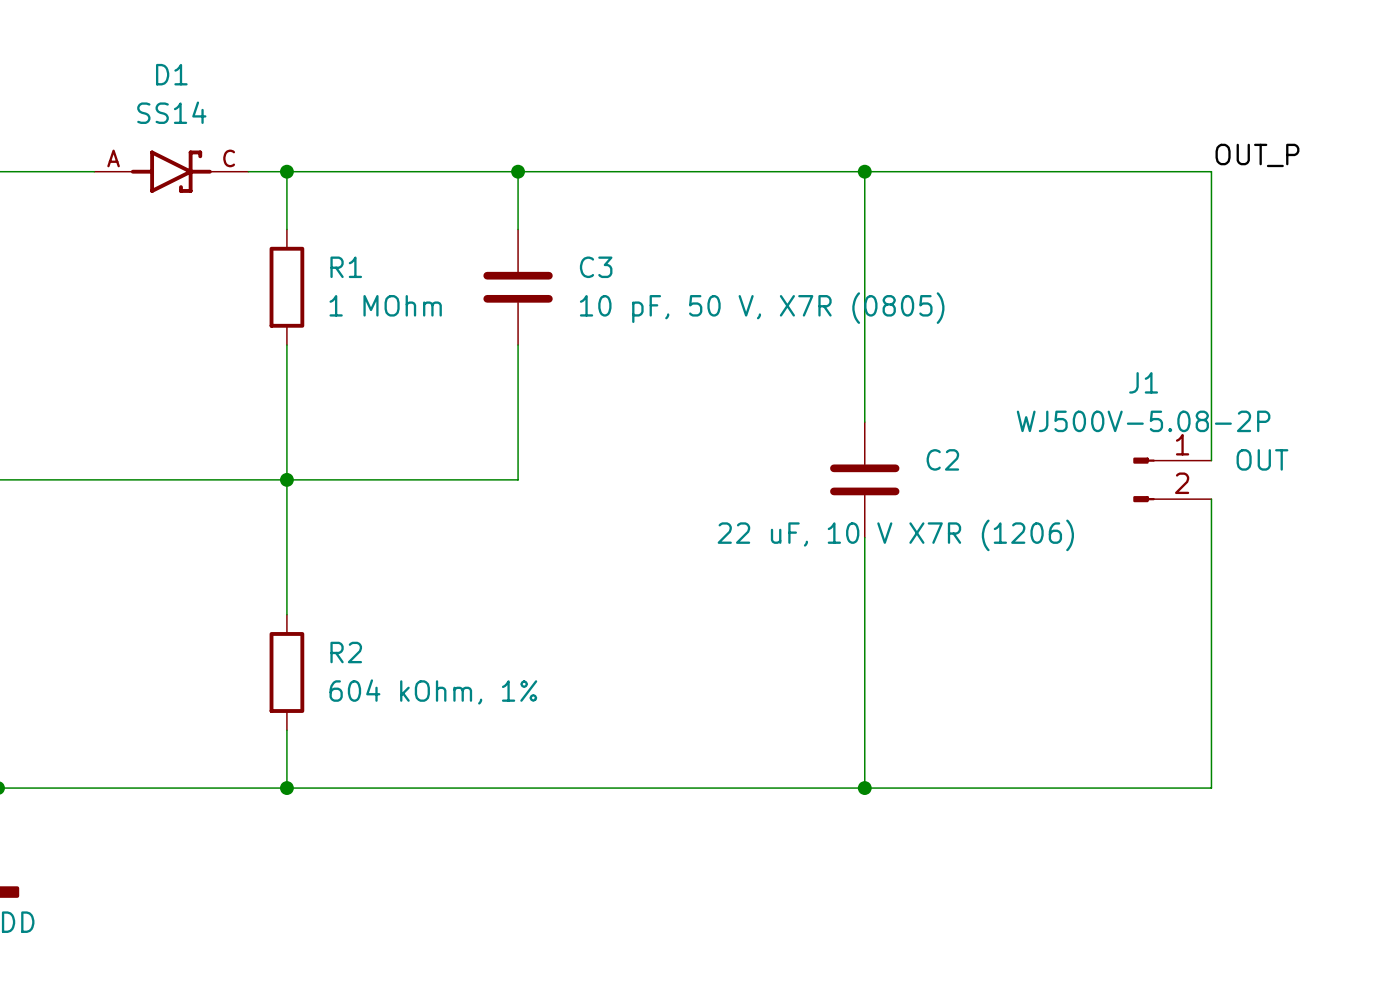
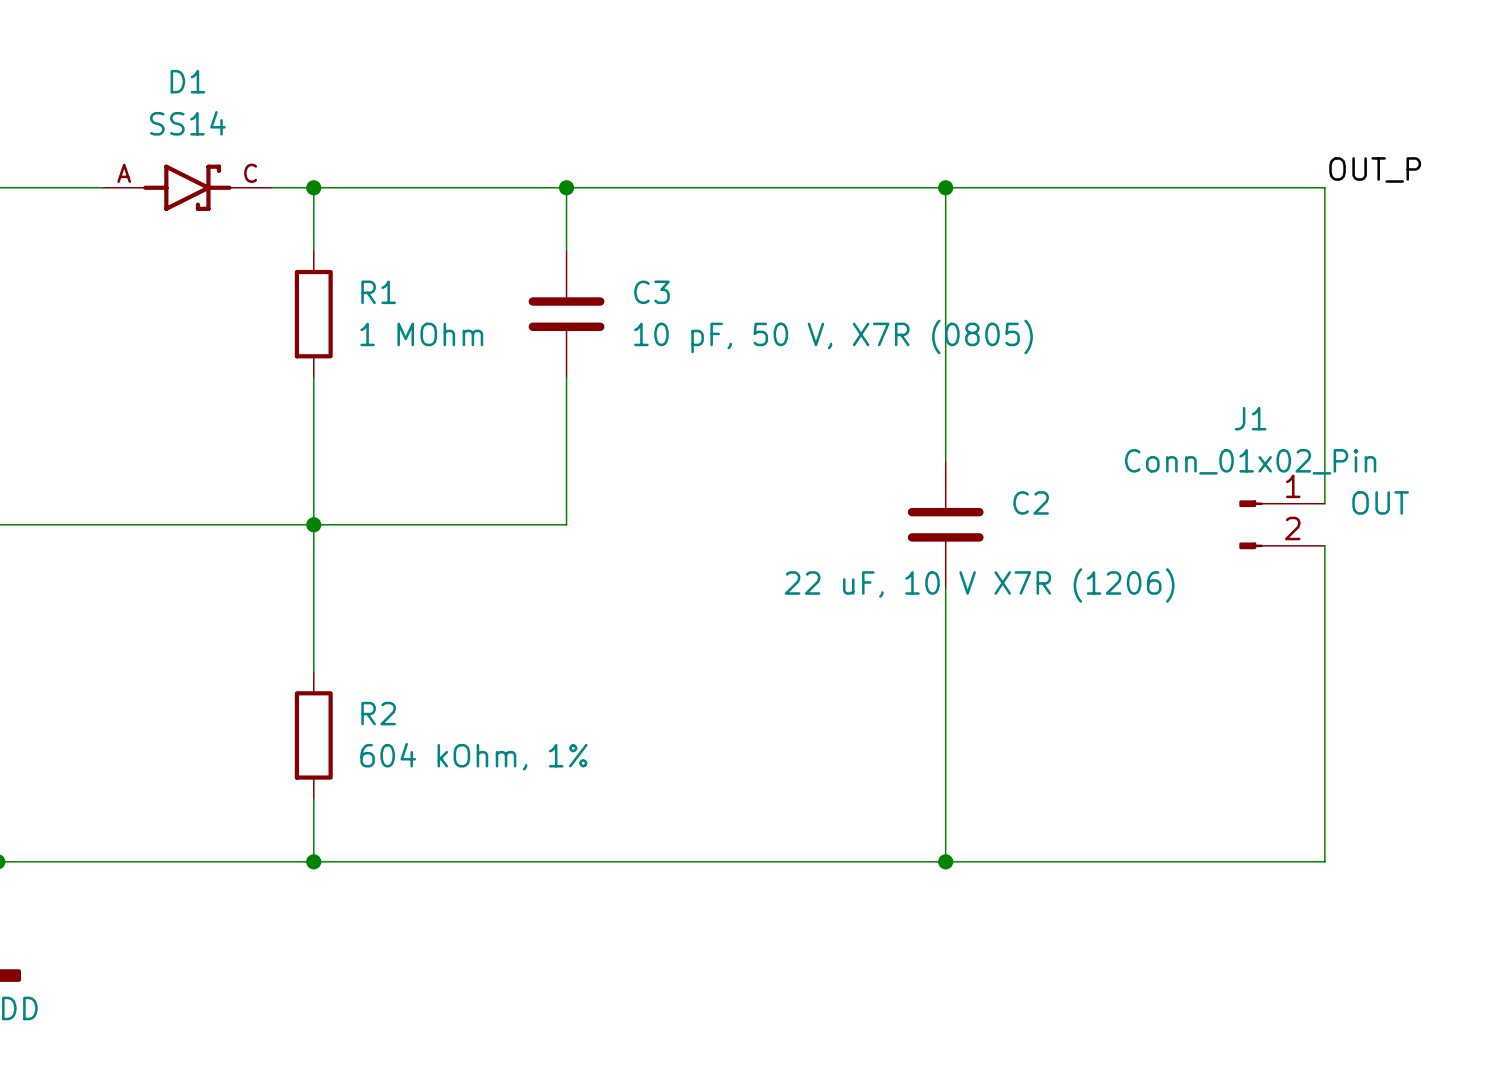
J1 value: WJ500V-5.08-2P (1143, 421) -> Conn_01x02_Pin (1250, 461)

